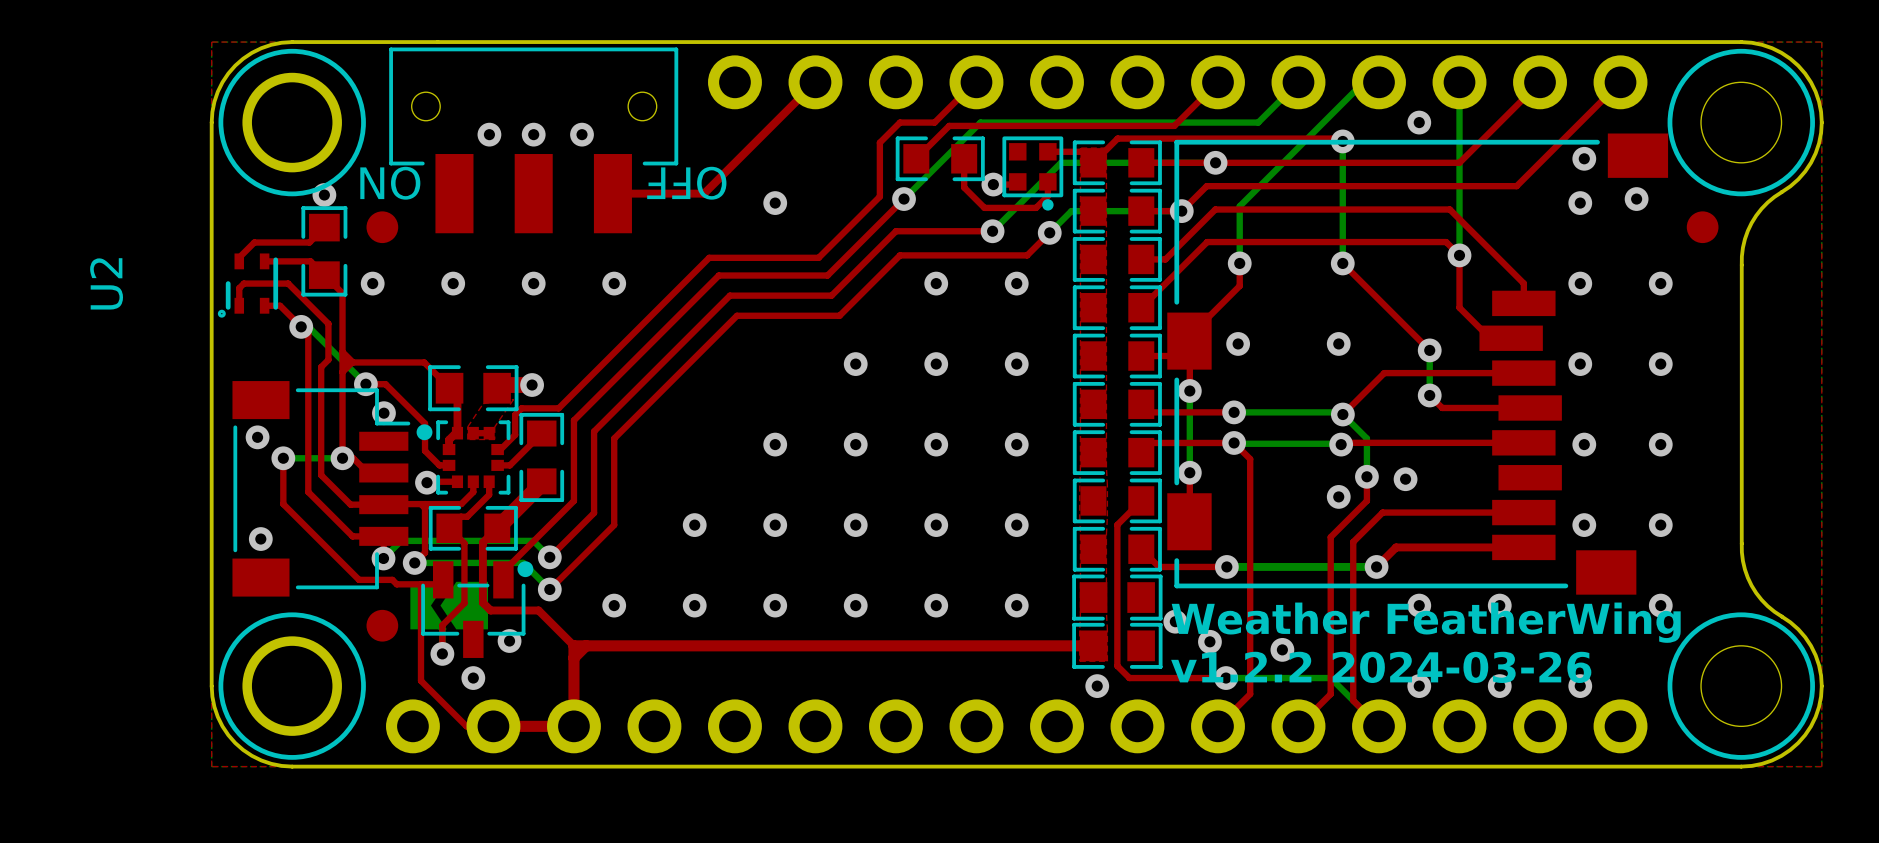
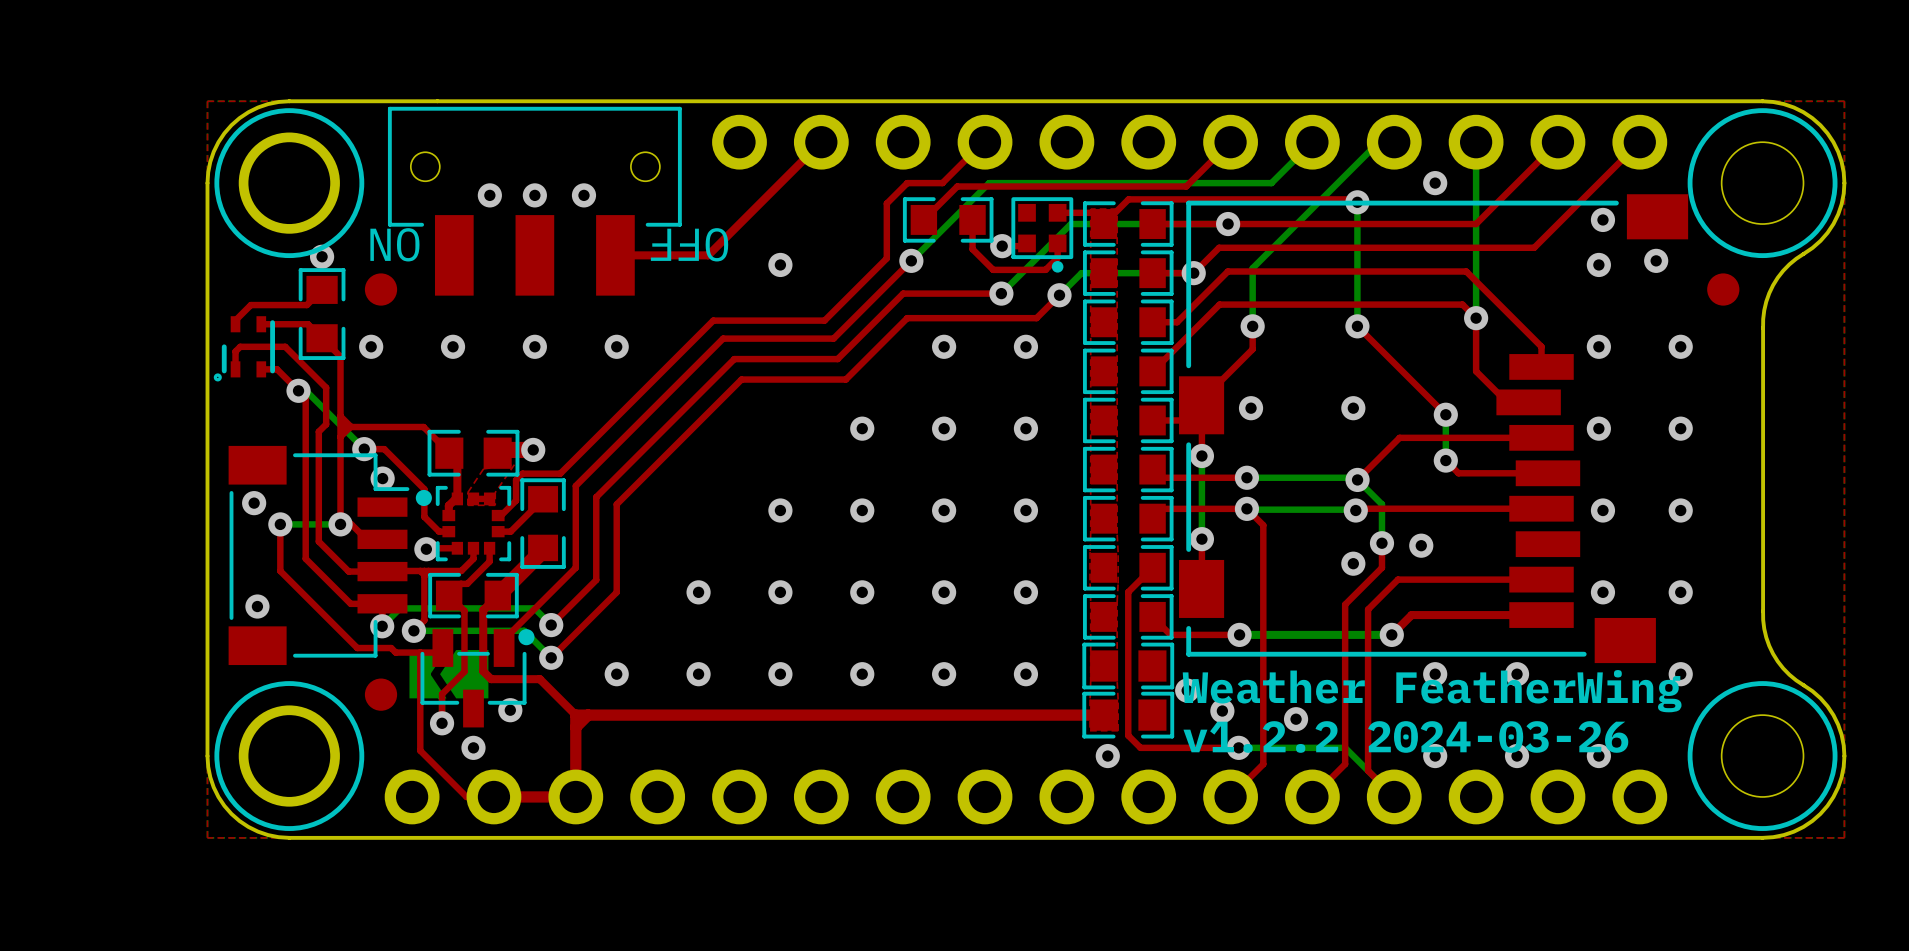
U2 name: U2 (106, 283) -> none

